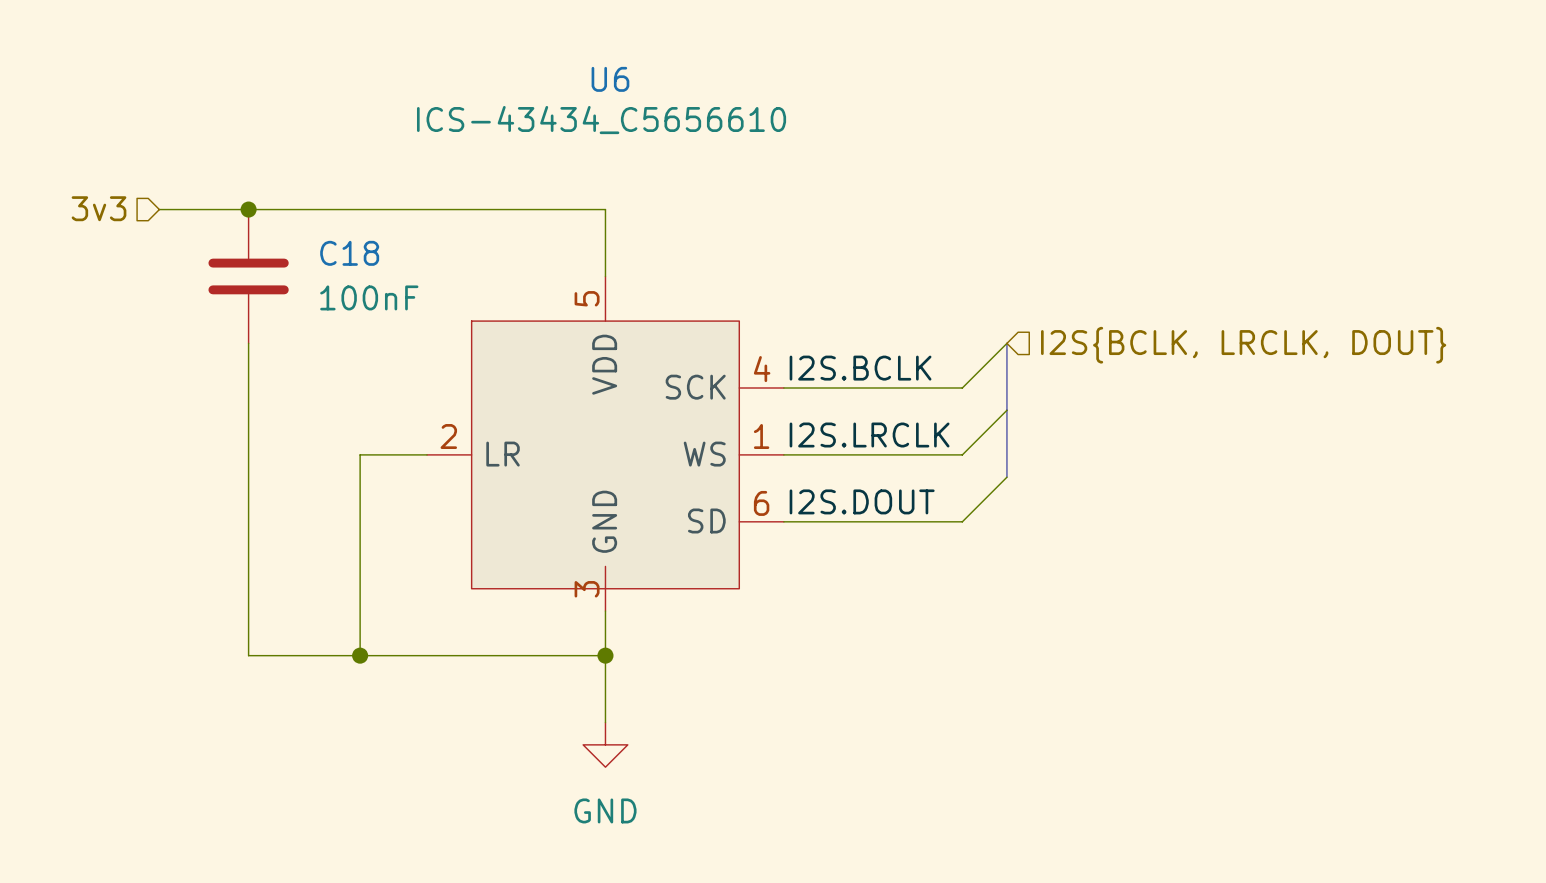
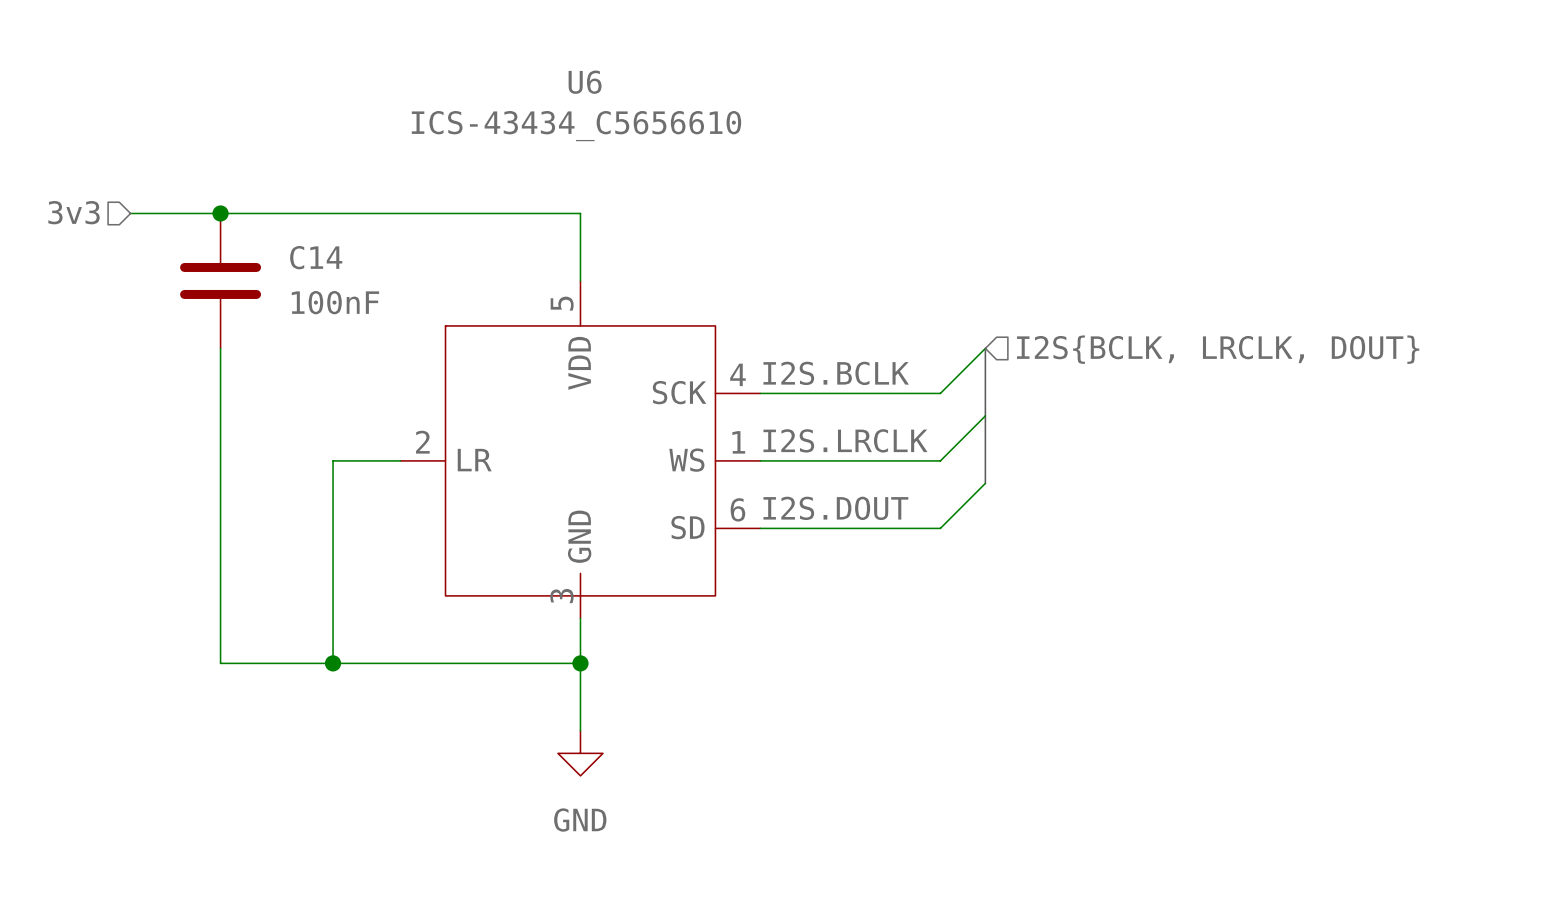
C18 name: C18 (349, 253) -> C14 (316, 257)

